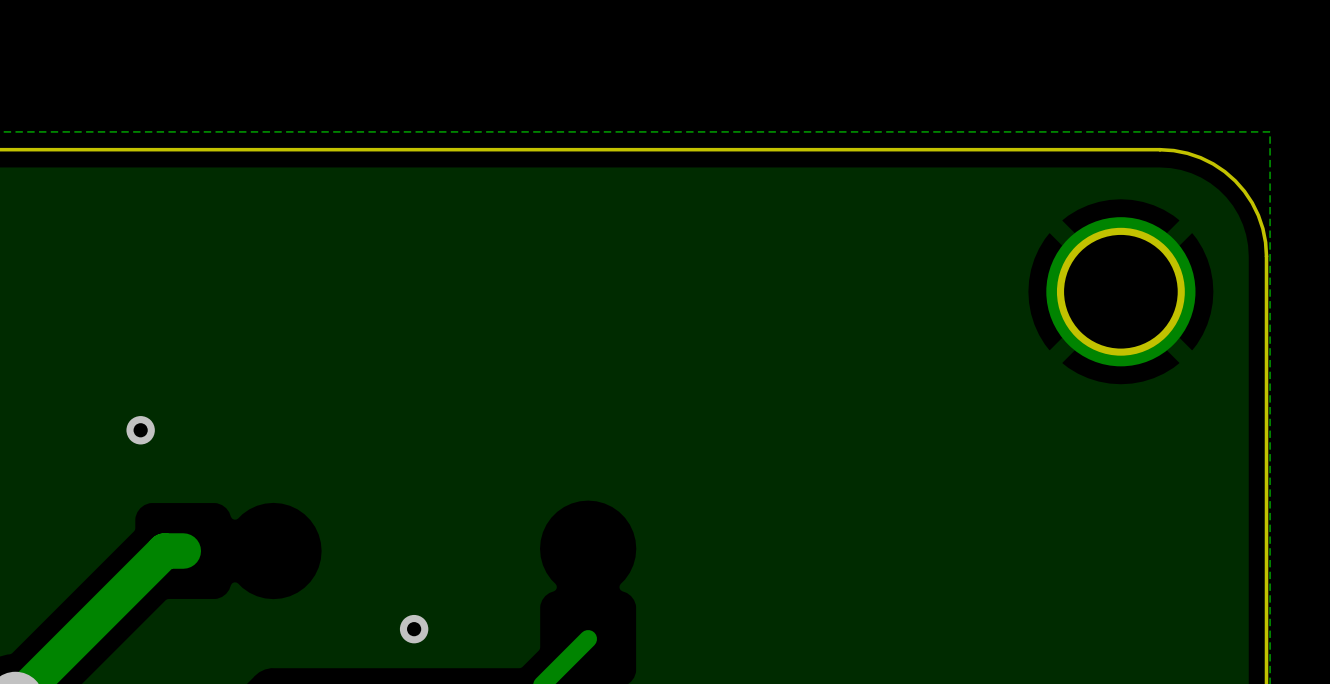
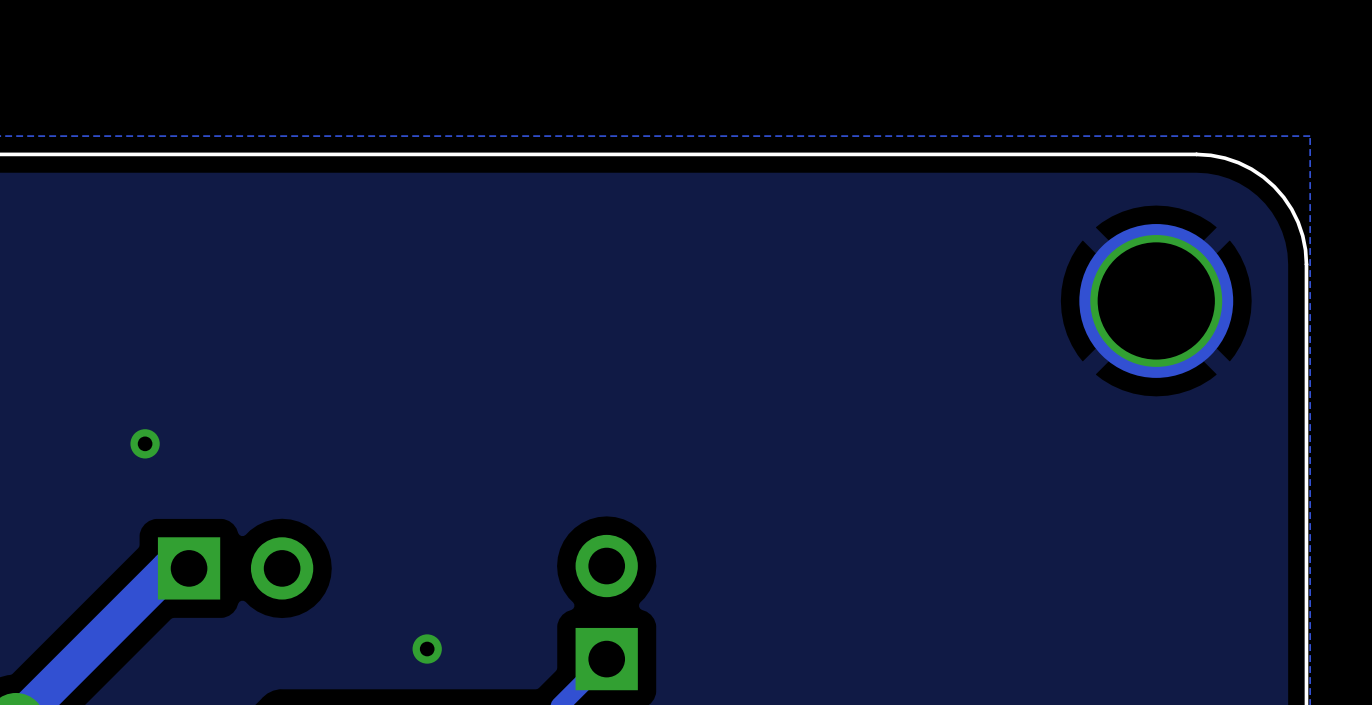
part: none -> (235, 568)
part: none -> (606, 612)

